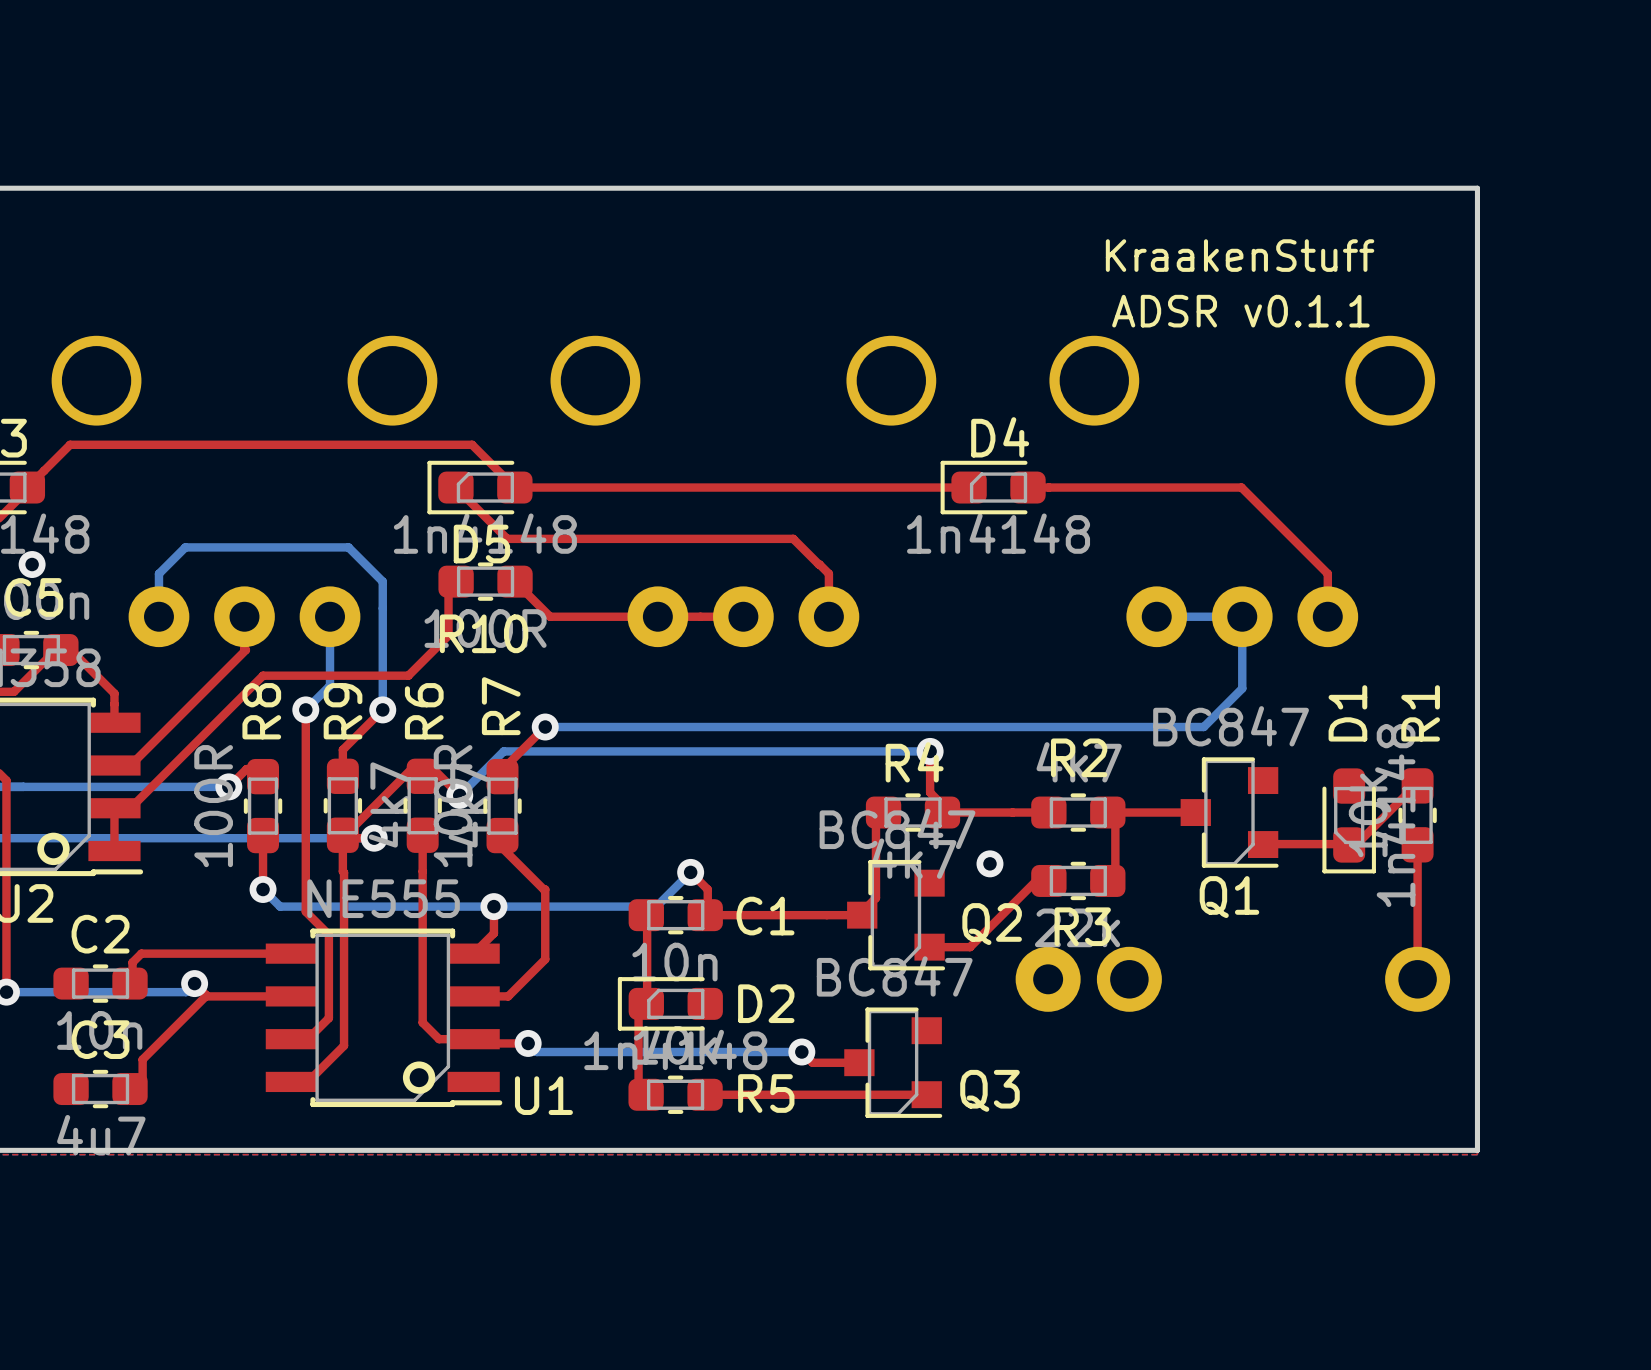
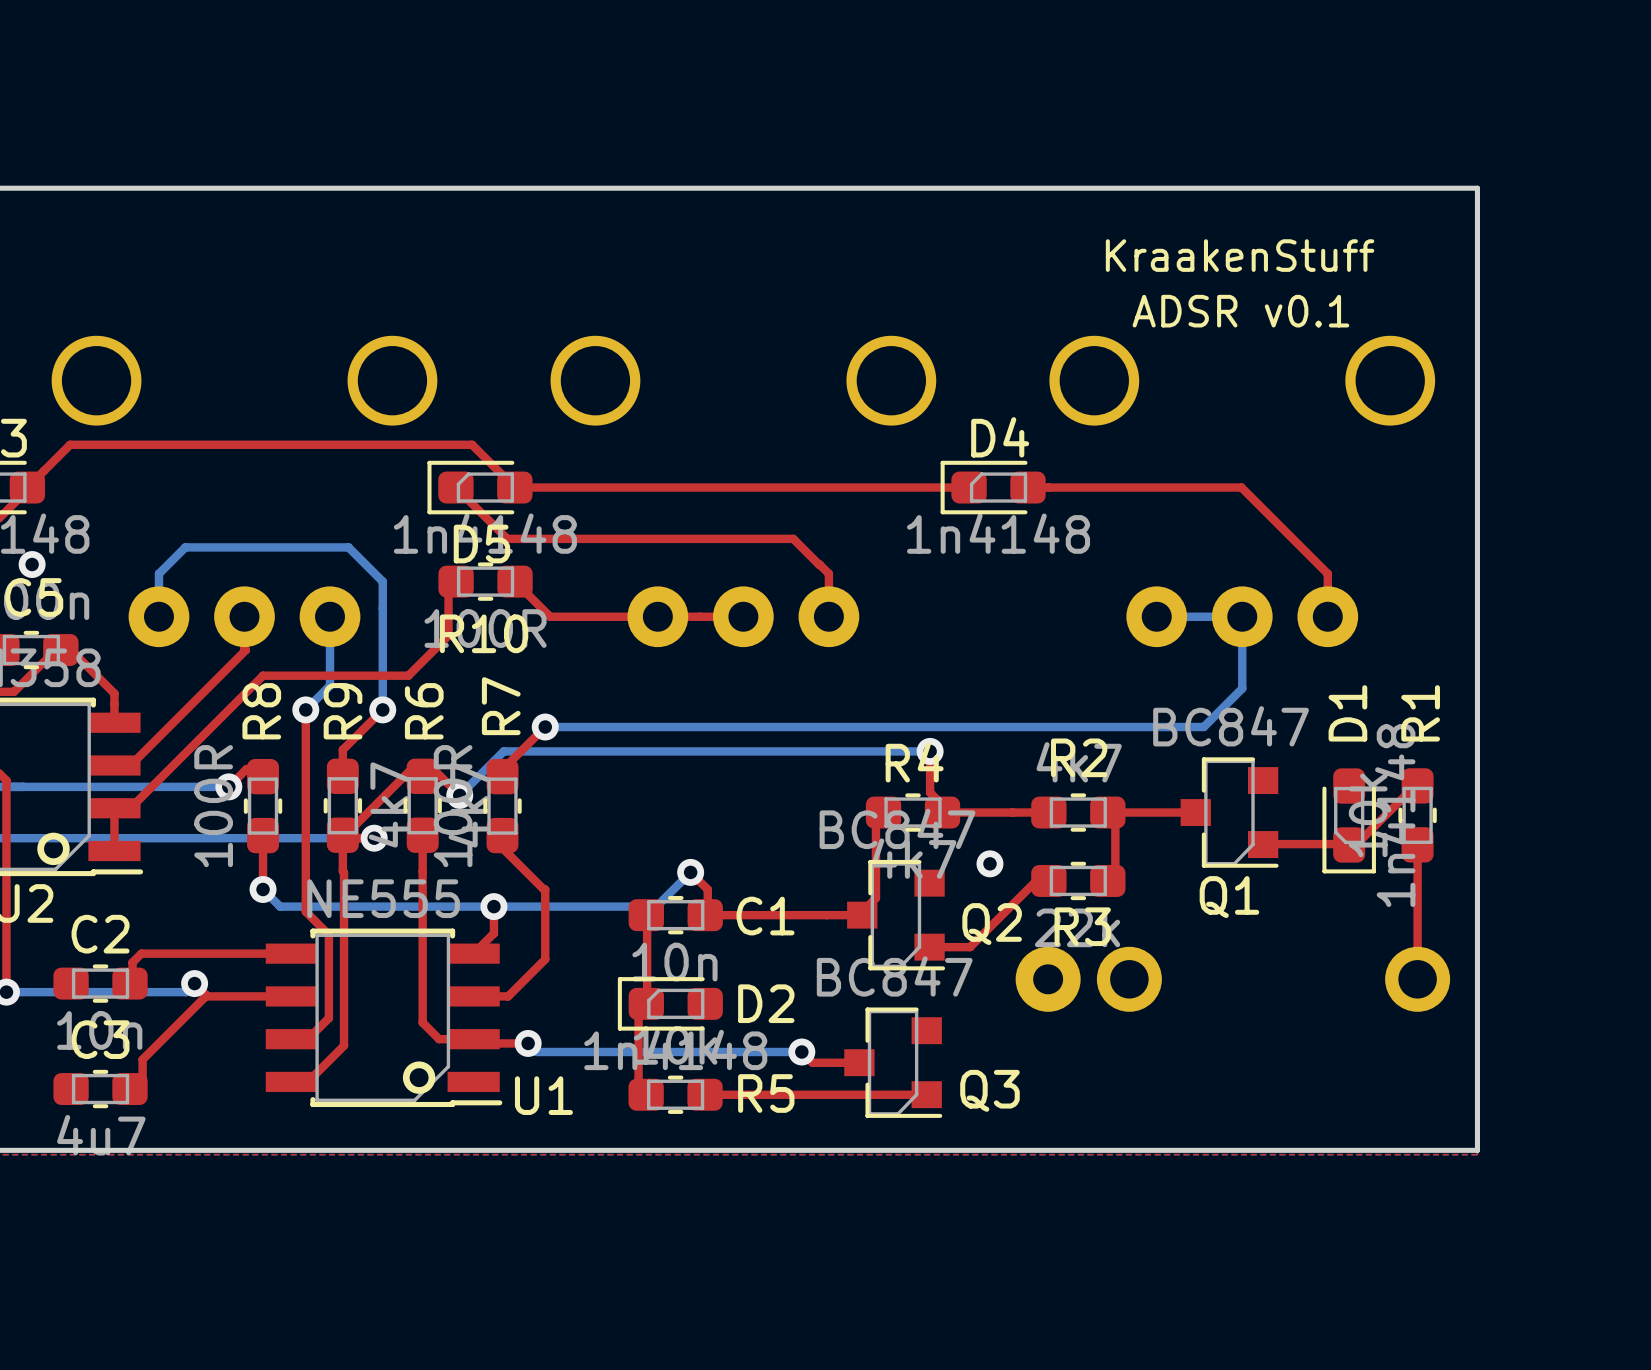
text: ADSR v0.1.1 (1240, 311) -> ADSR v0.1 (1240, 311)

